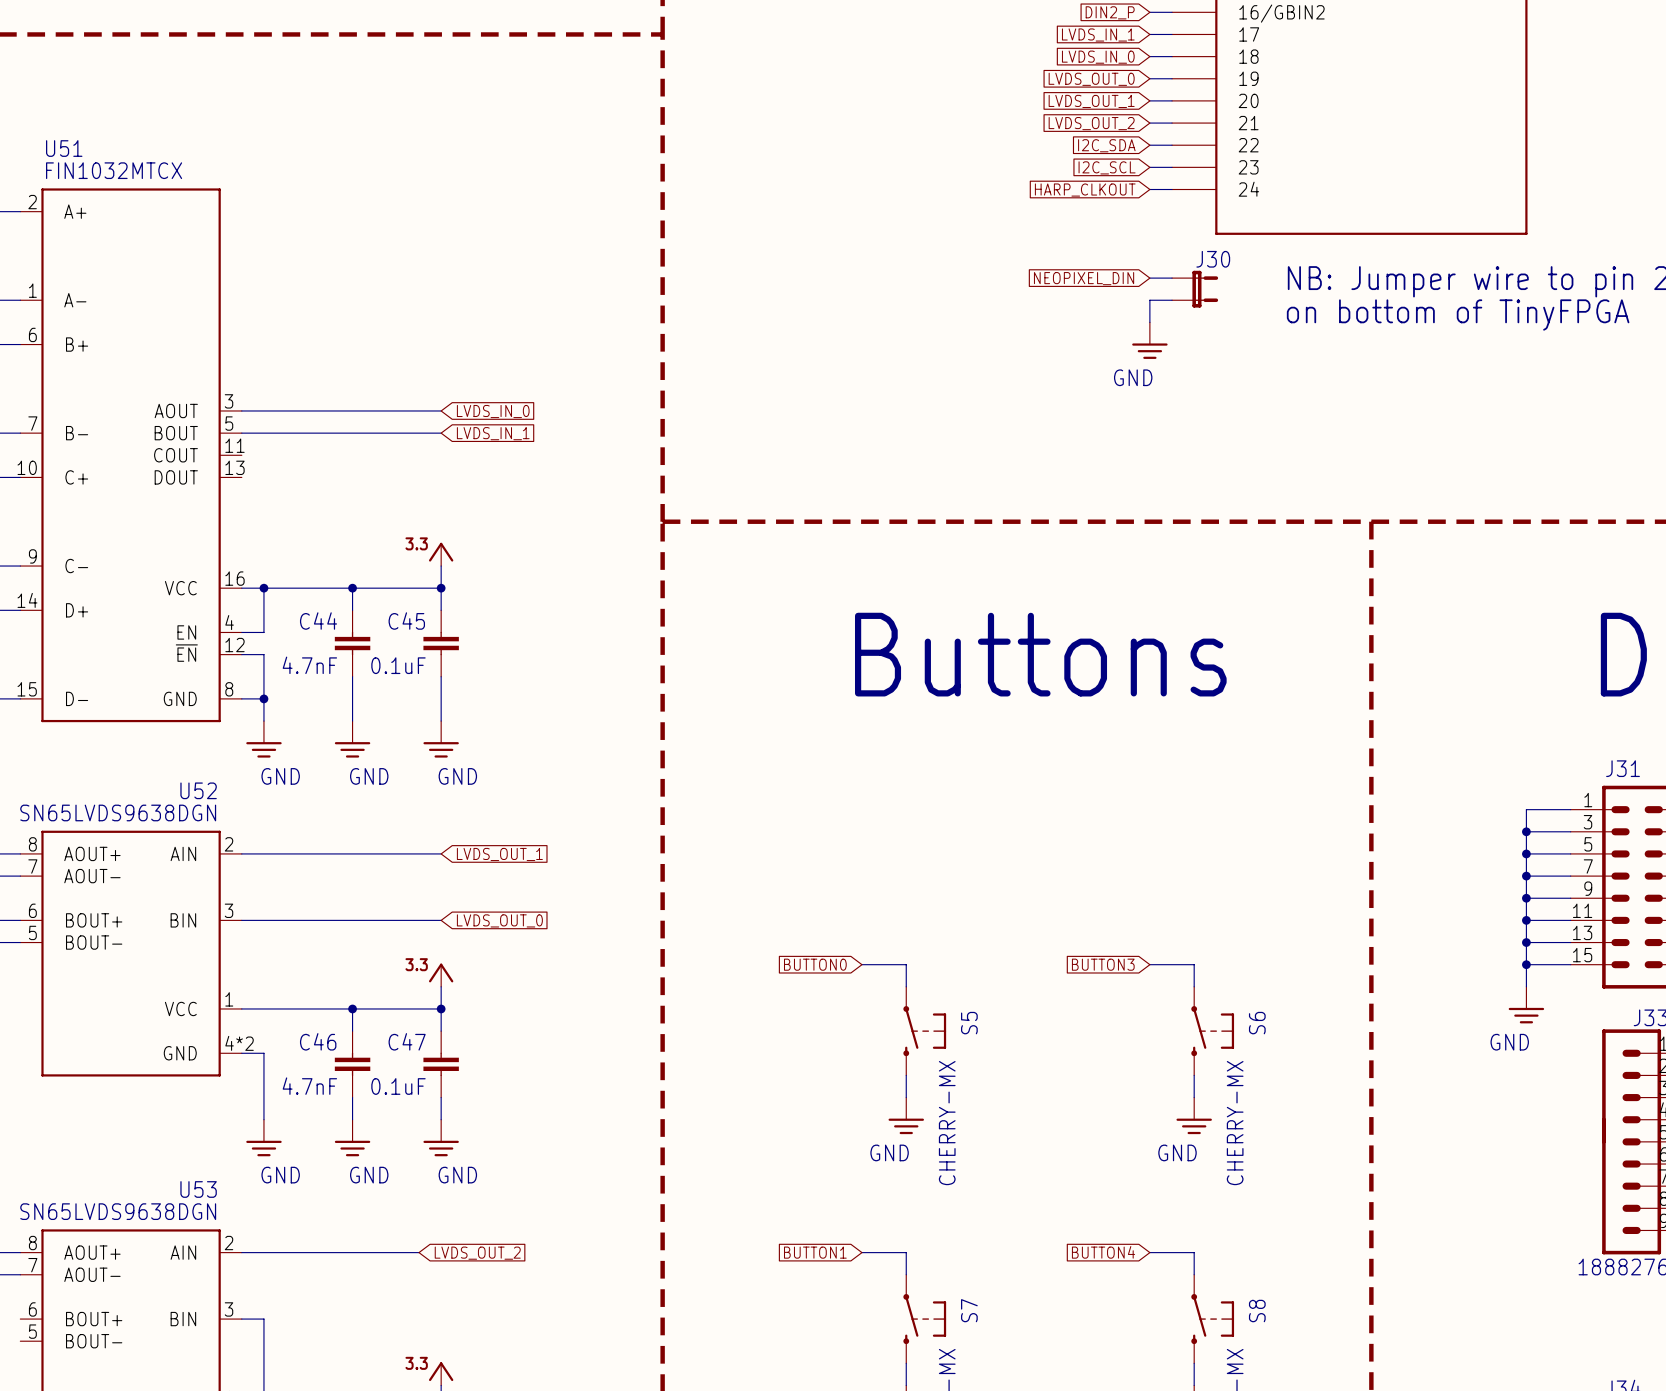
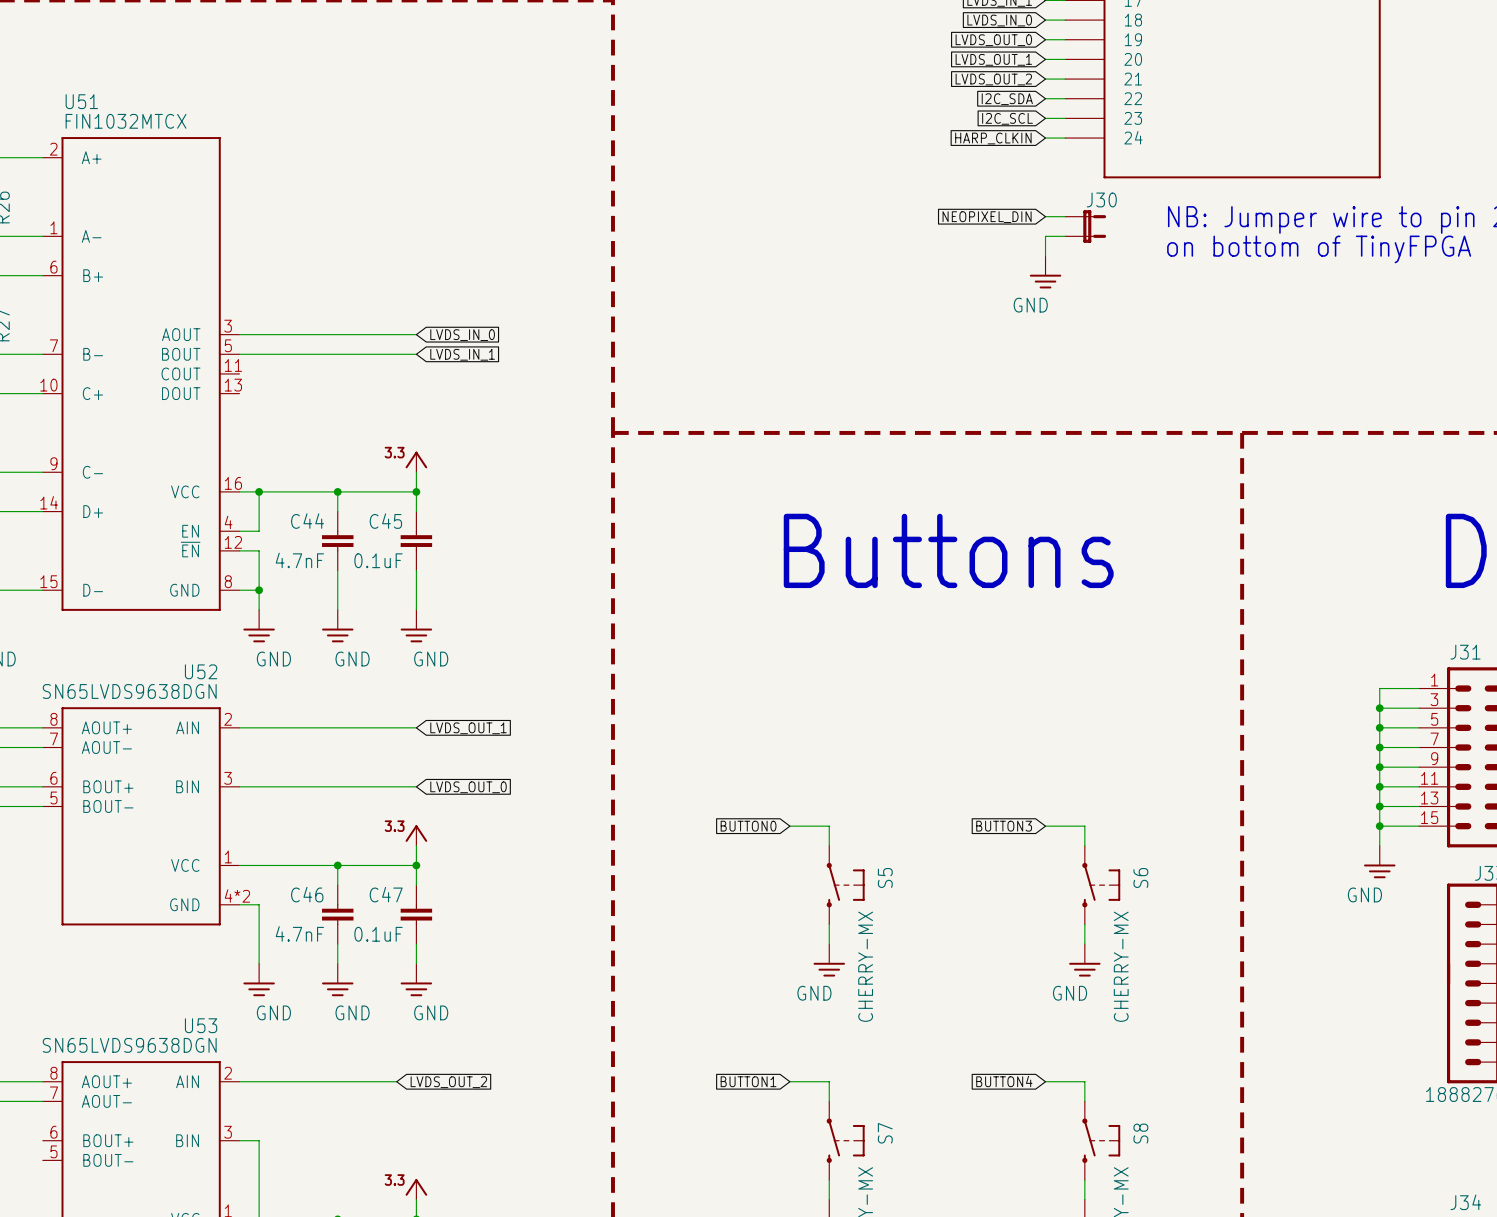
global label: HARP_CLKOUT (1085, 190) -> HARP_CLKIN (993, 138)

